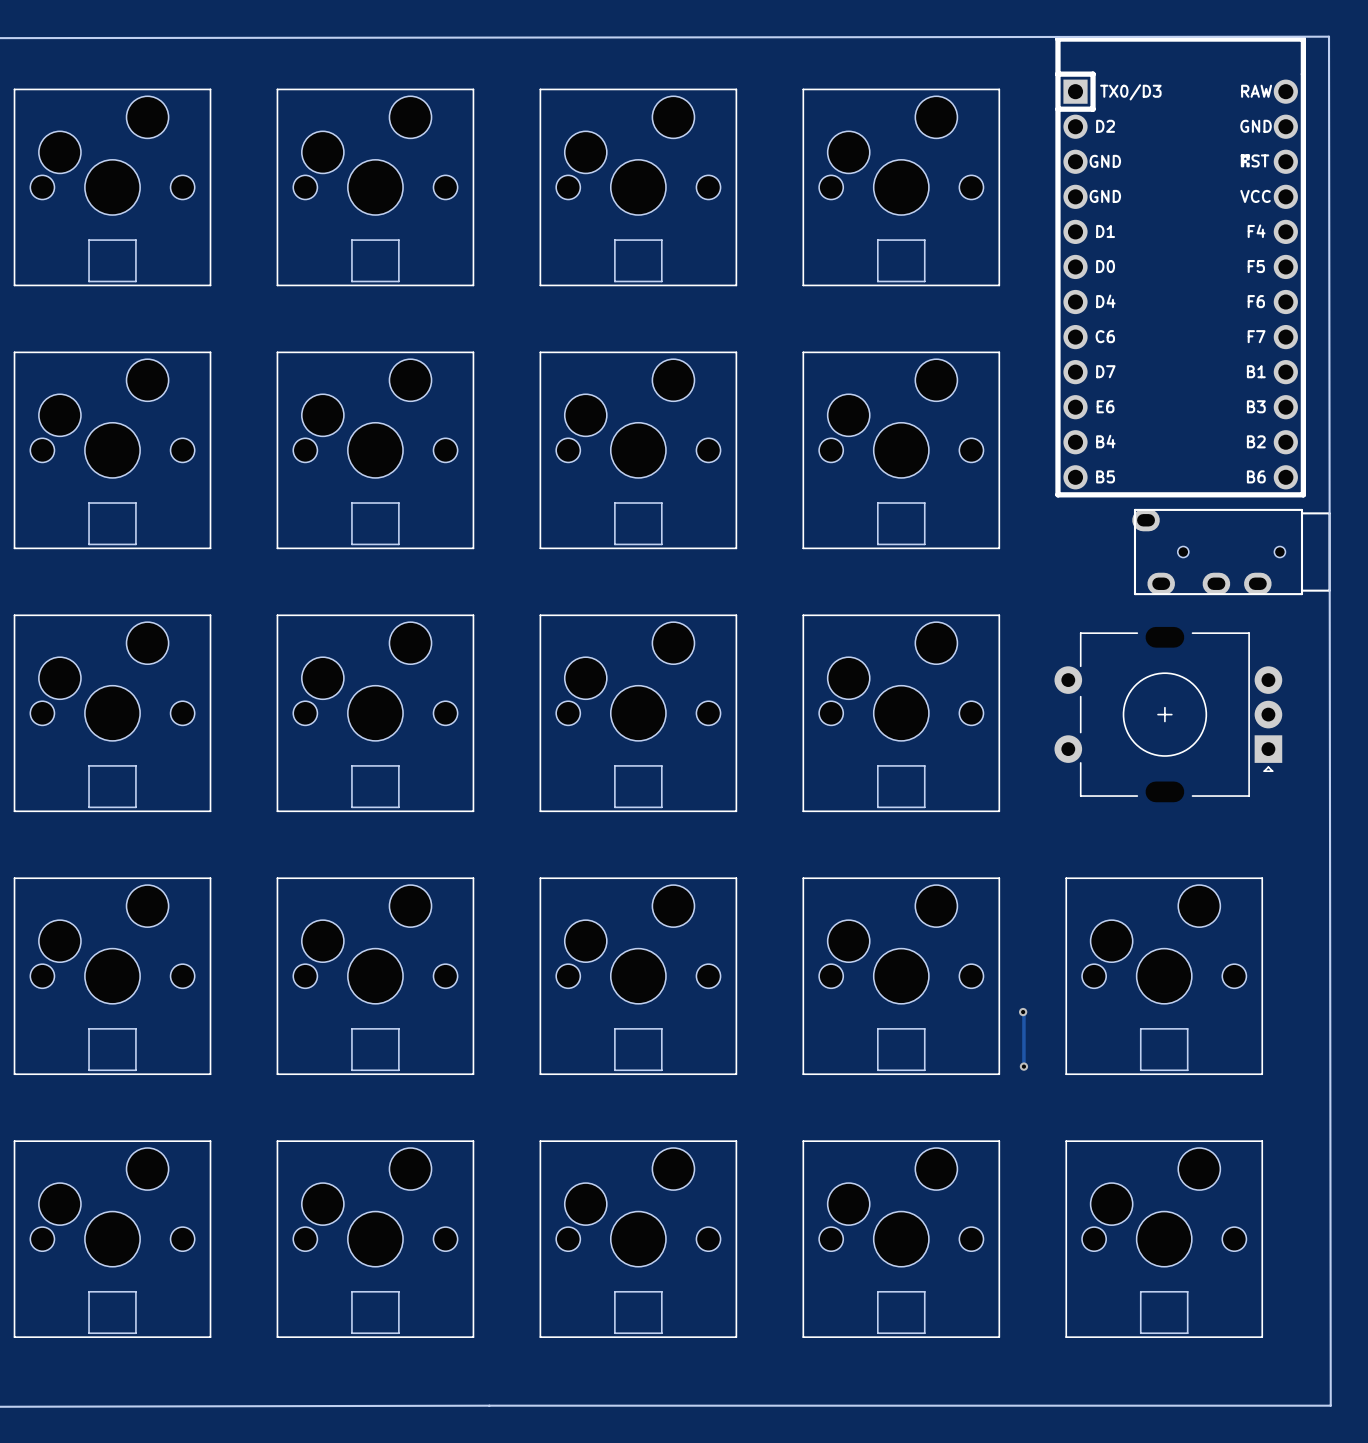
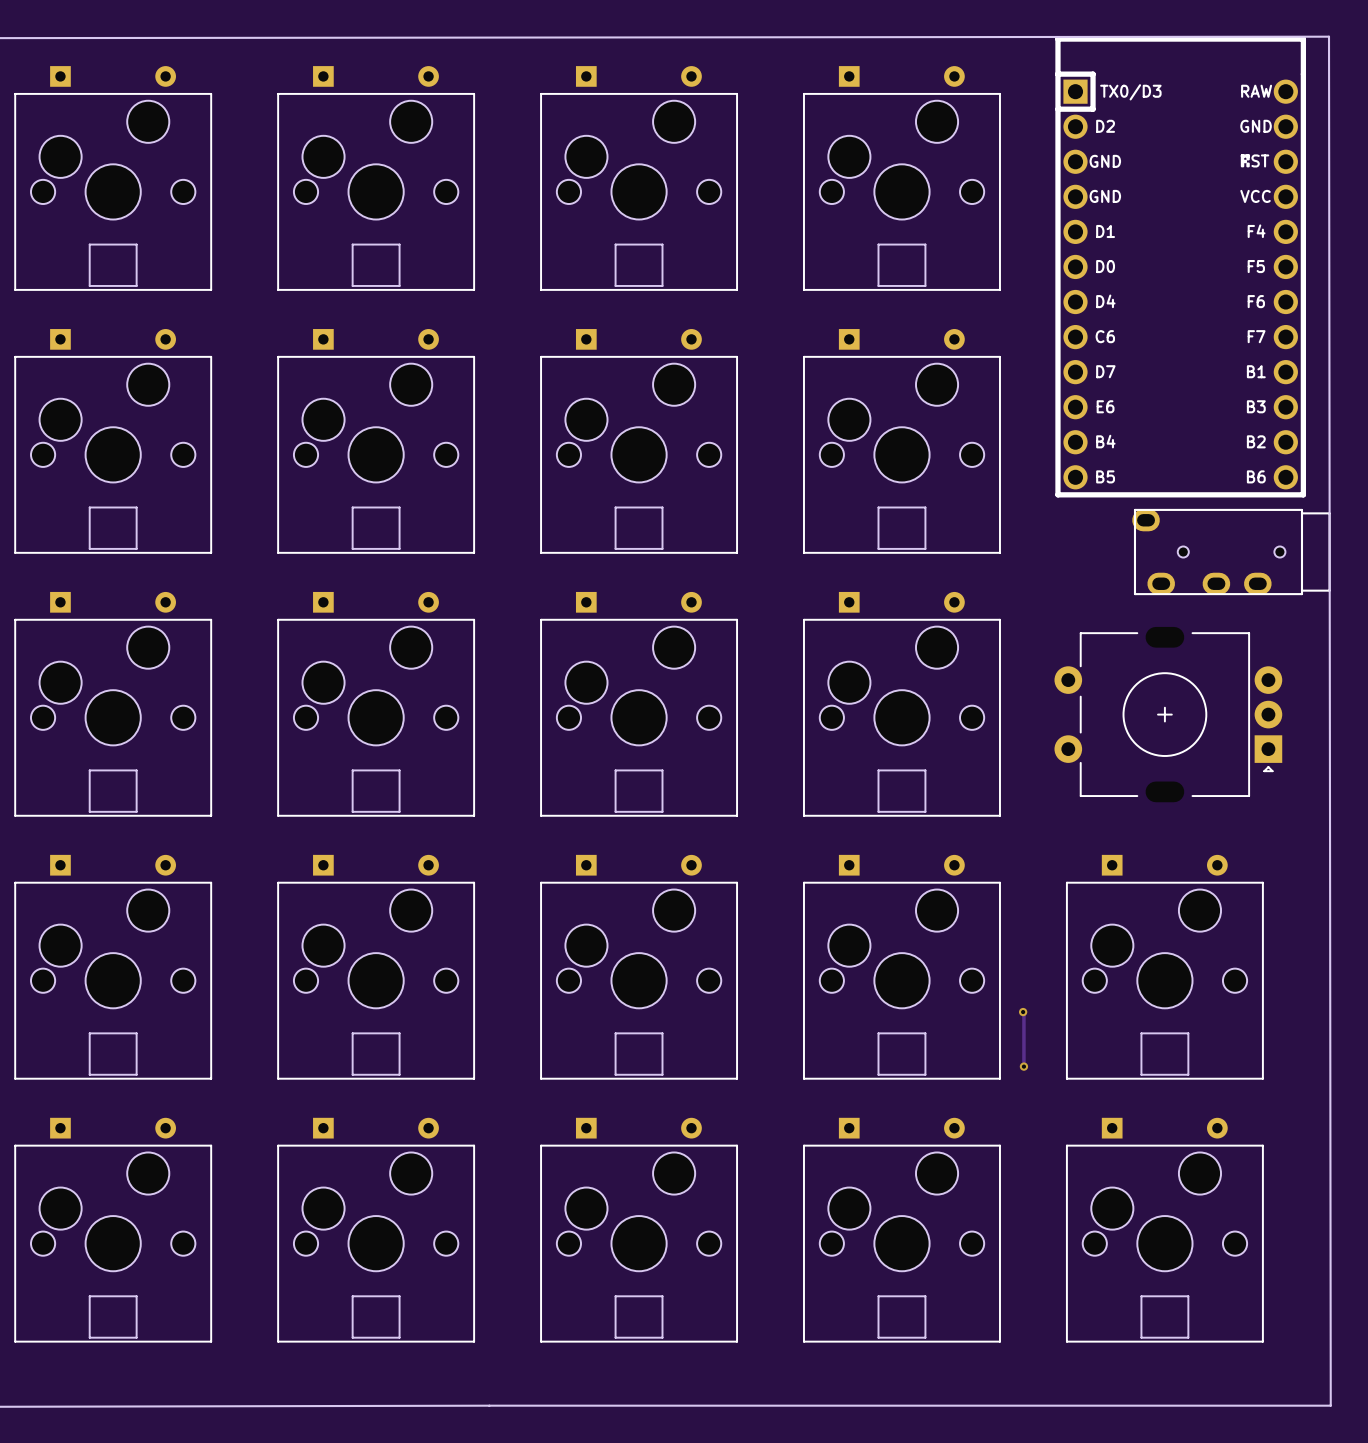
part footprint: [13, 88, 212, 287] -> [14, 66, 213, 291]
part footprint: [276, 88, 475, 287] -> [277, 66, 475, 291]
part footprint: [539, 88, 738, 287] -> [540, 66, 738, 291]
part footprint: [802, 88, 1001, 287] -> [803, 66, 1001, 291]
part footprint: [13, 351, 212, 550] -> [14, 329, 213, 554]
part footprint: [276, 351, 475, 550] -> [277, 329, 475, 554]
part footprint: [539, 351, 738, 550] -> [540, 329, 738, 554]
part footprint: [802, 351, 1001, 550] -> [803, 329, 1001, 554]
part footprint: [13, 614, 212, 813] -> [14, 591, 213, 817]
part footprint: [276, 614, 475, 813] -> [277, 591, 475, 817]
part footprint: [539, 614, 738, 813] -> [540, 591, 738, 817]
part footprint: [802, 614, 1001, 813] -> [803, 591, 1001, 817]
part footprint: [13, 877, 212, 1076] -> [14, 854, 213, 1080]
part footprint: [276, 877, 475, 1076] -> [277, 854, 475, 1080]
part footprint: [539, 877, 738, 1076] -> [540, 854, 738, 1080]
part footprint: [802, 877, 1001, 1076] -> [803, 854, 1001, 1080]
part footprint: [1065, 877, 1264, 1076] -> [1066, 854, 1264, 1080]
part footprint: [13, 1140, 212, 1338] -> [14, 1117, 213, 1343]
part footprint: [276, 1140, 475, 1338] -> [277, 1117, 475, 1343]
part footprint: [539, 1140, 738, 1338] -> [540, 1117, 738, 1343]
part footprint: [802, 1140, 1001, 1338] -> [803, 1117, 1001, 1343]
part footprint: [1065, 1140, 1264, 1338] -> [1066, 1117, 1264, 1343]

